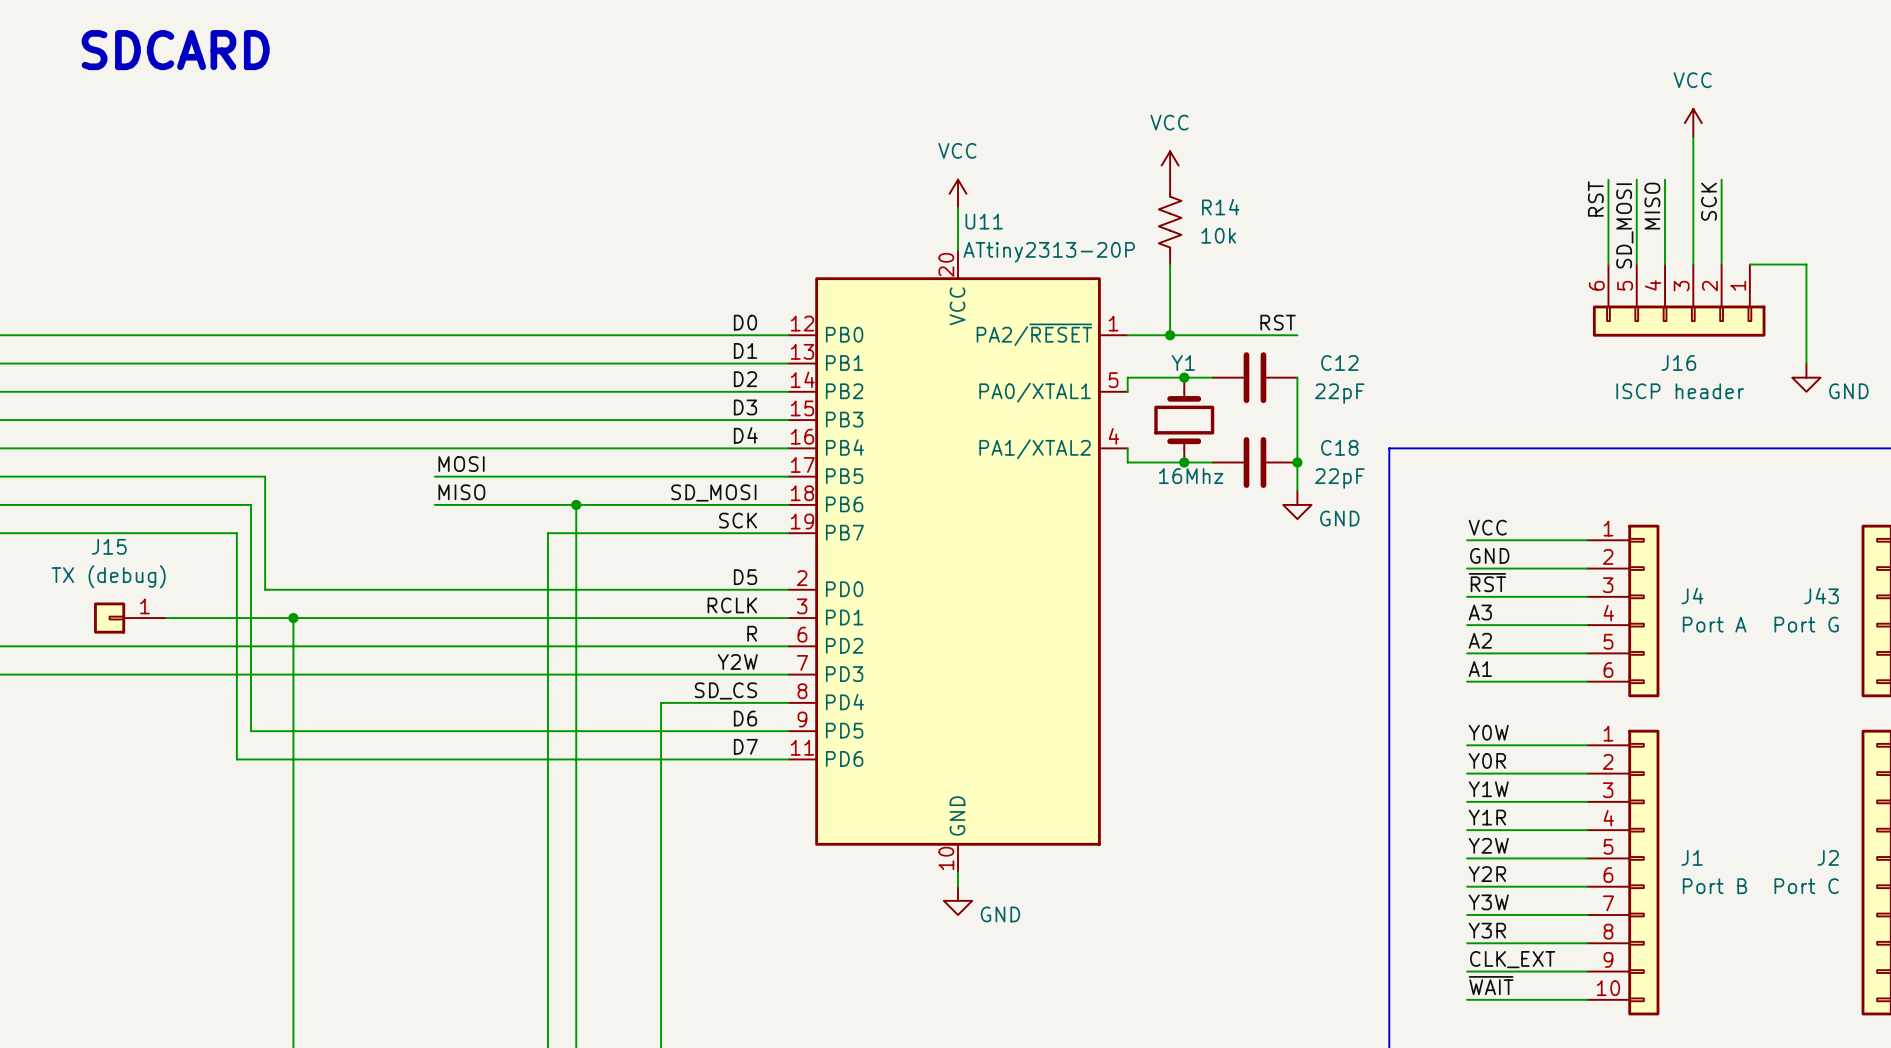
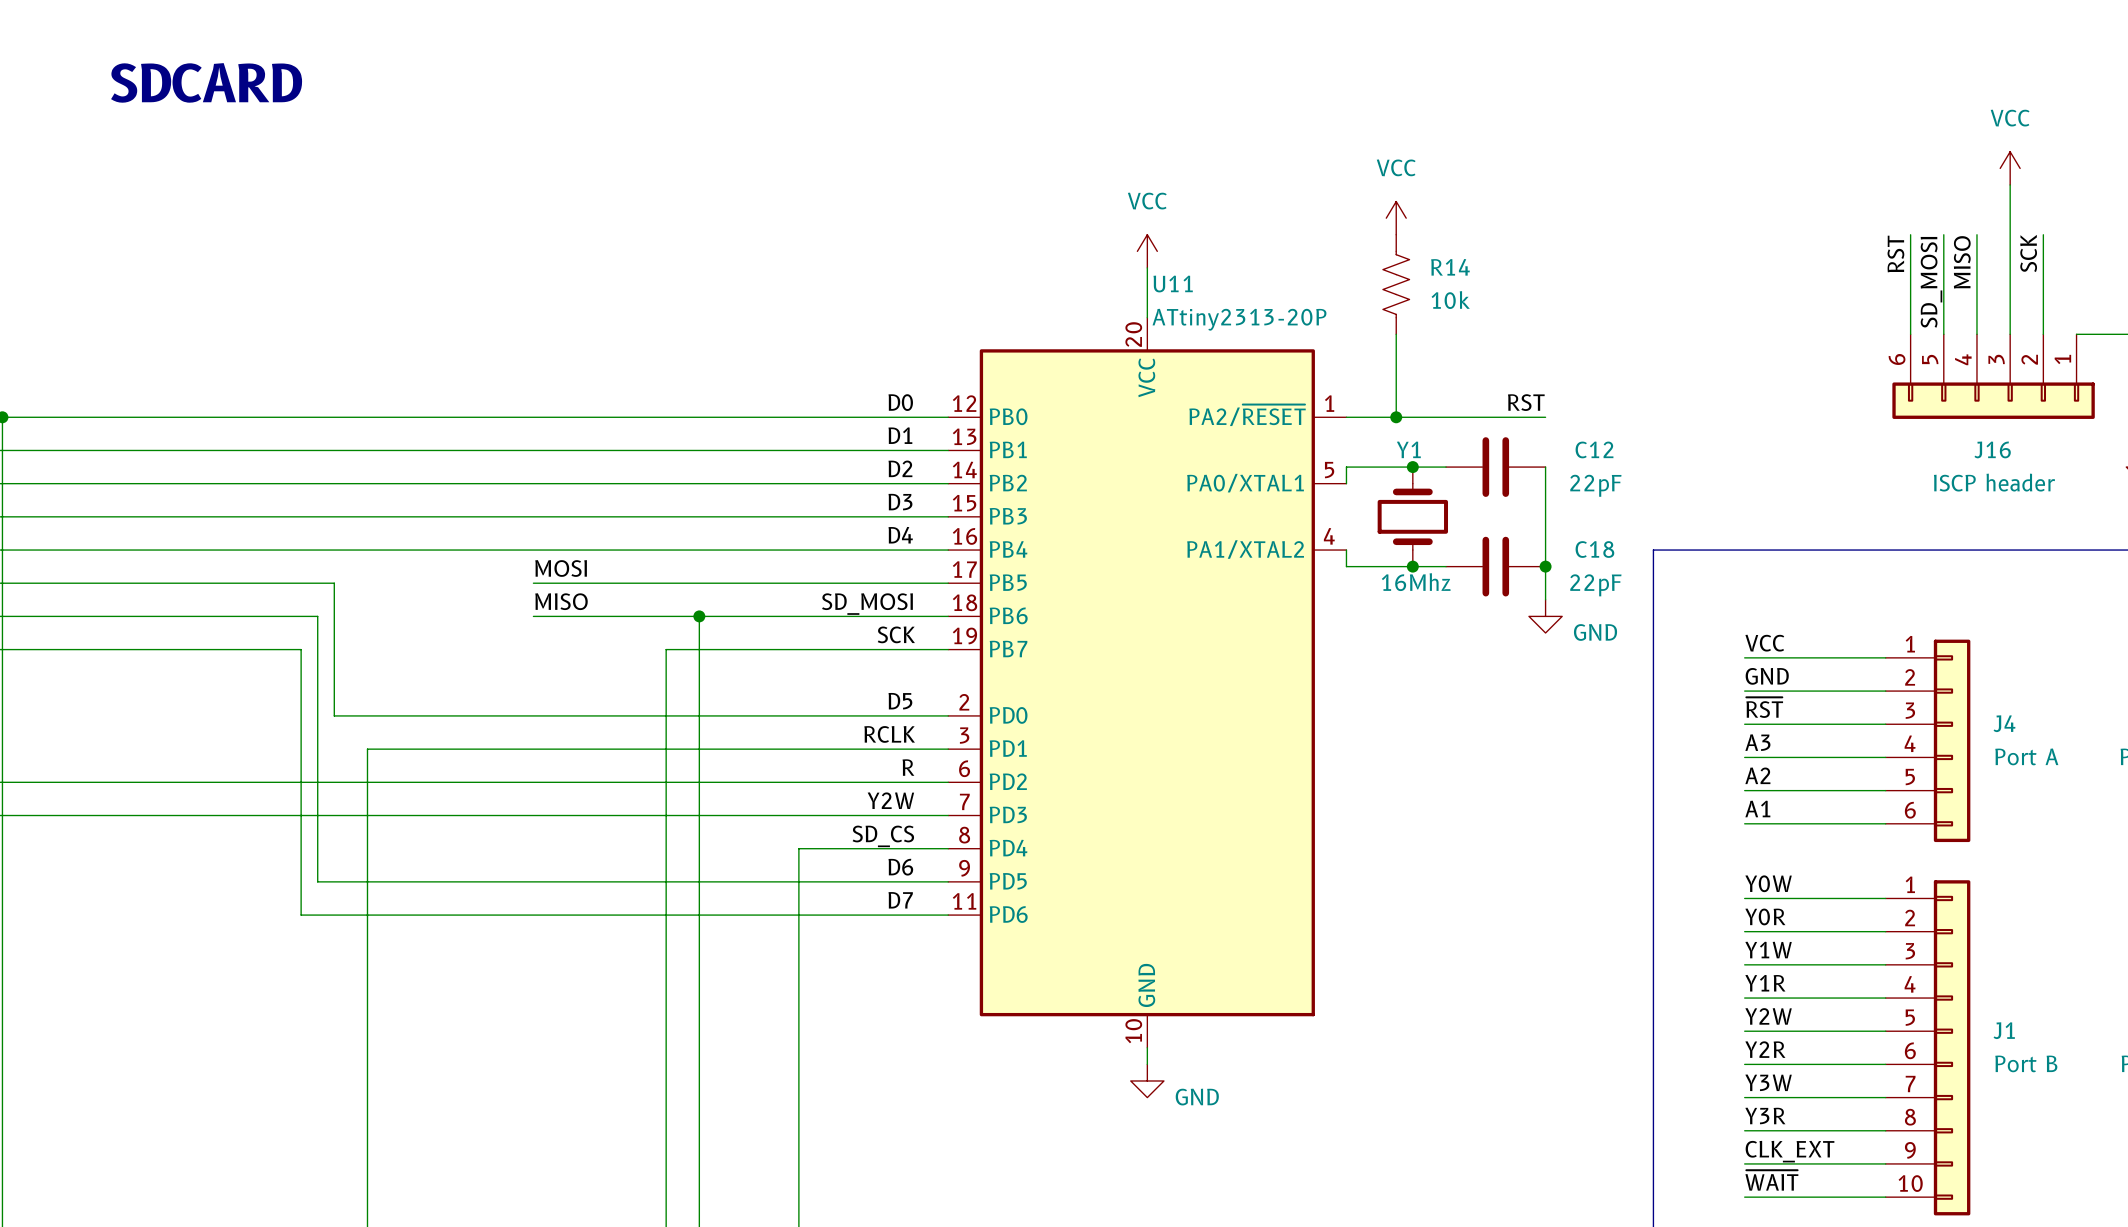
J15: TX (debug) (130, 618) -> none
wire: (166, 618) (293, 618) -> none
junction: (293, 618) -> none

